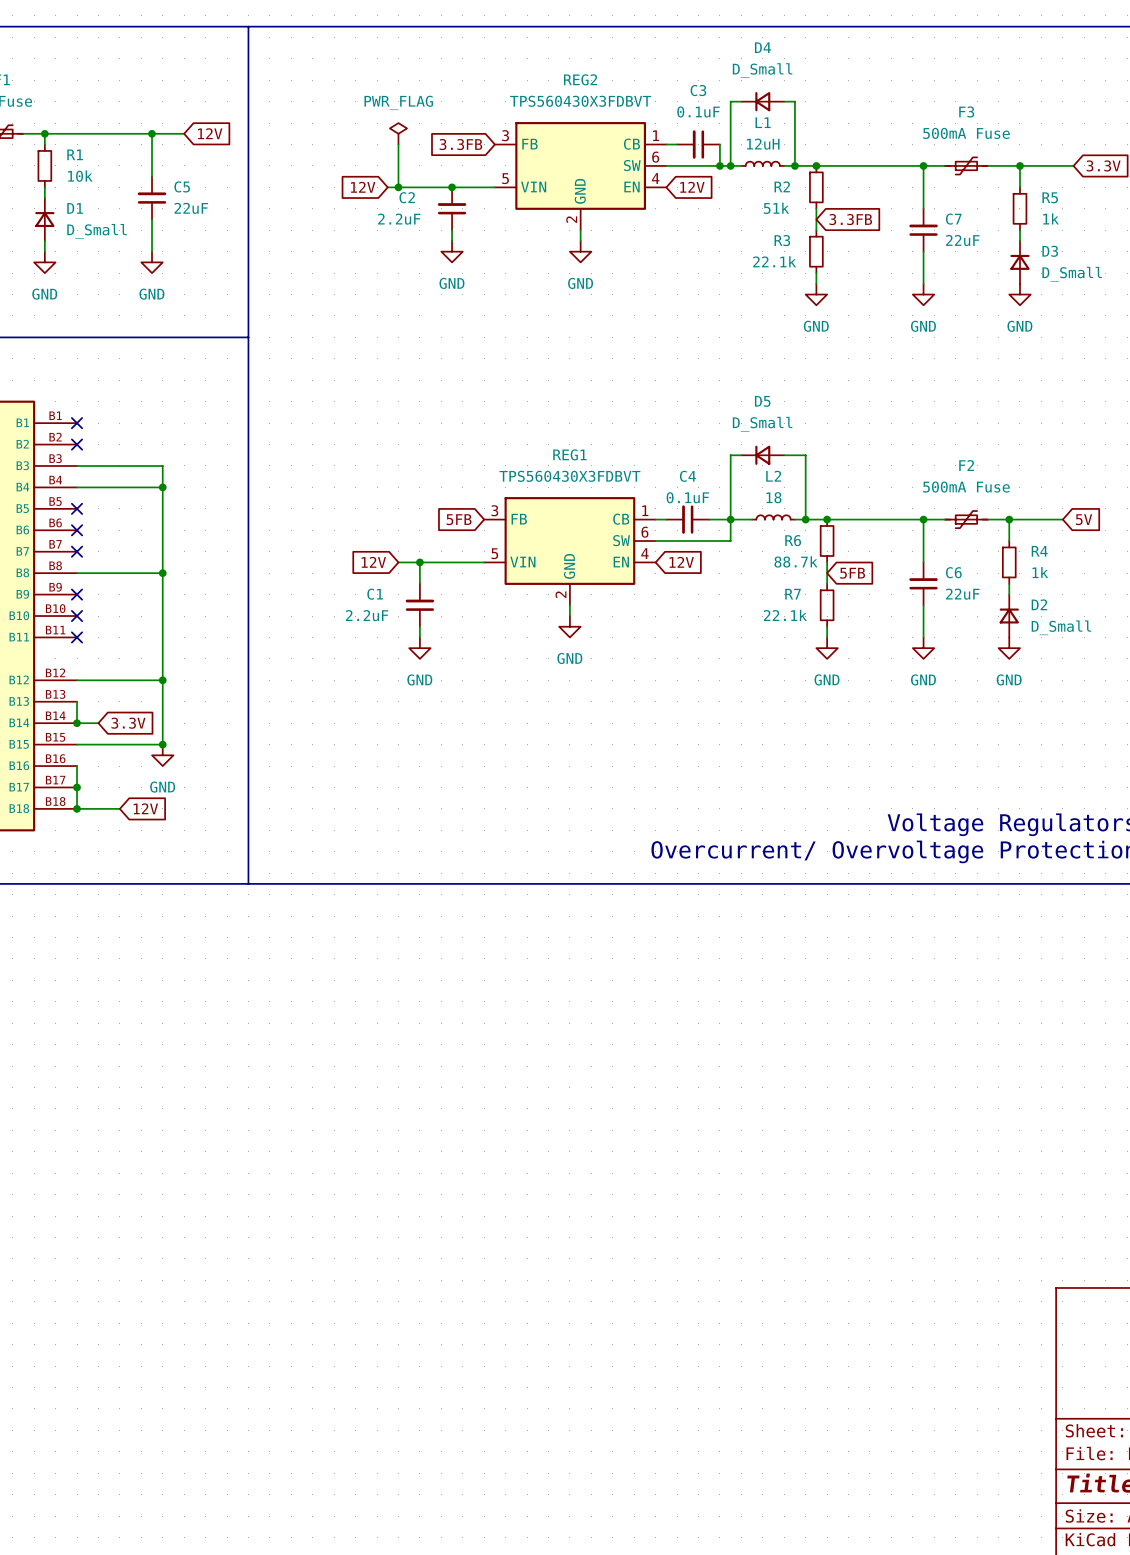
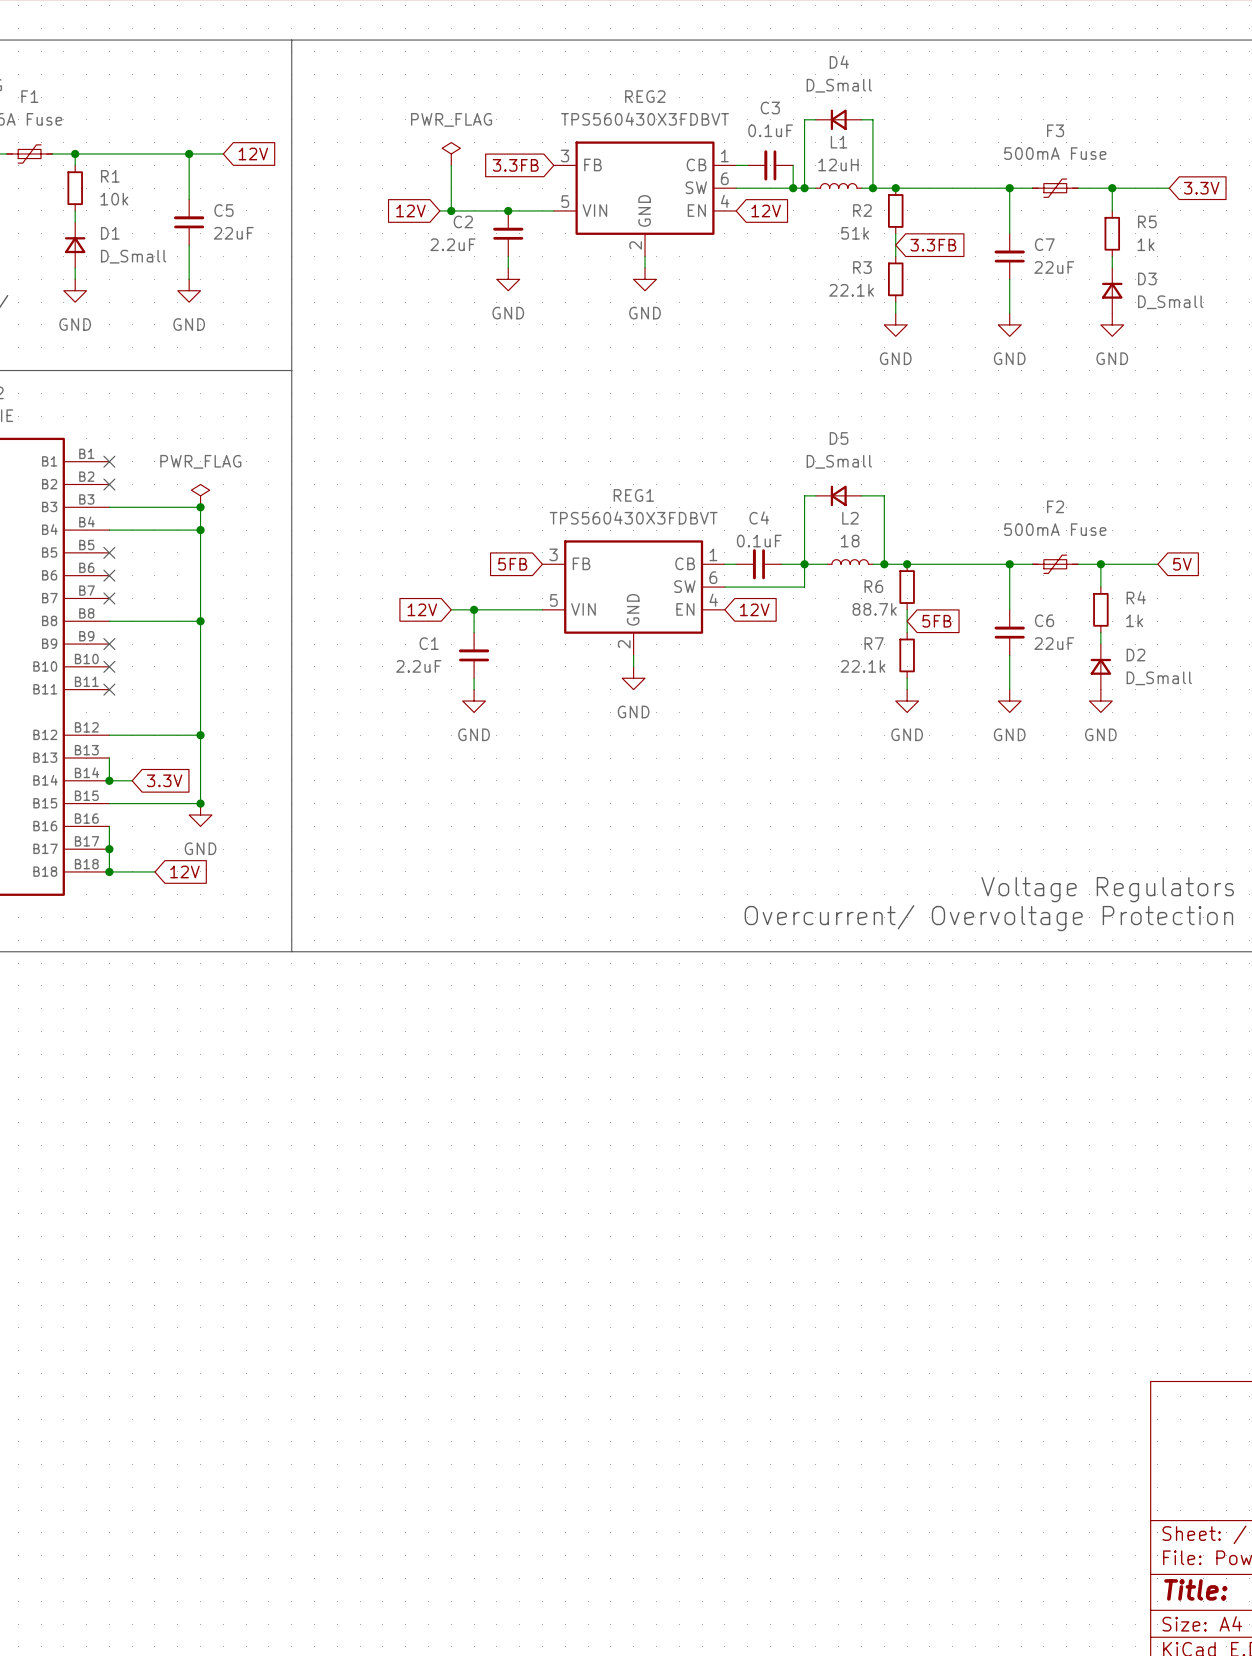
power symbol: none -> PWR_FLAG (200, 495)
junction: none -> (200, 507)

